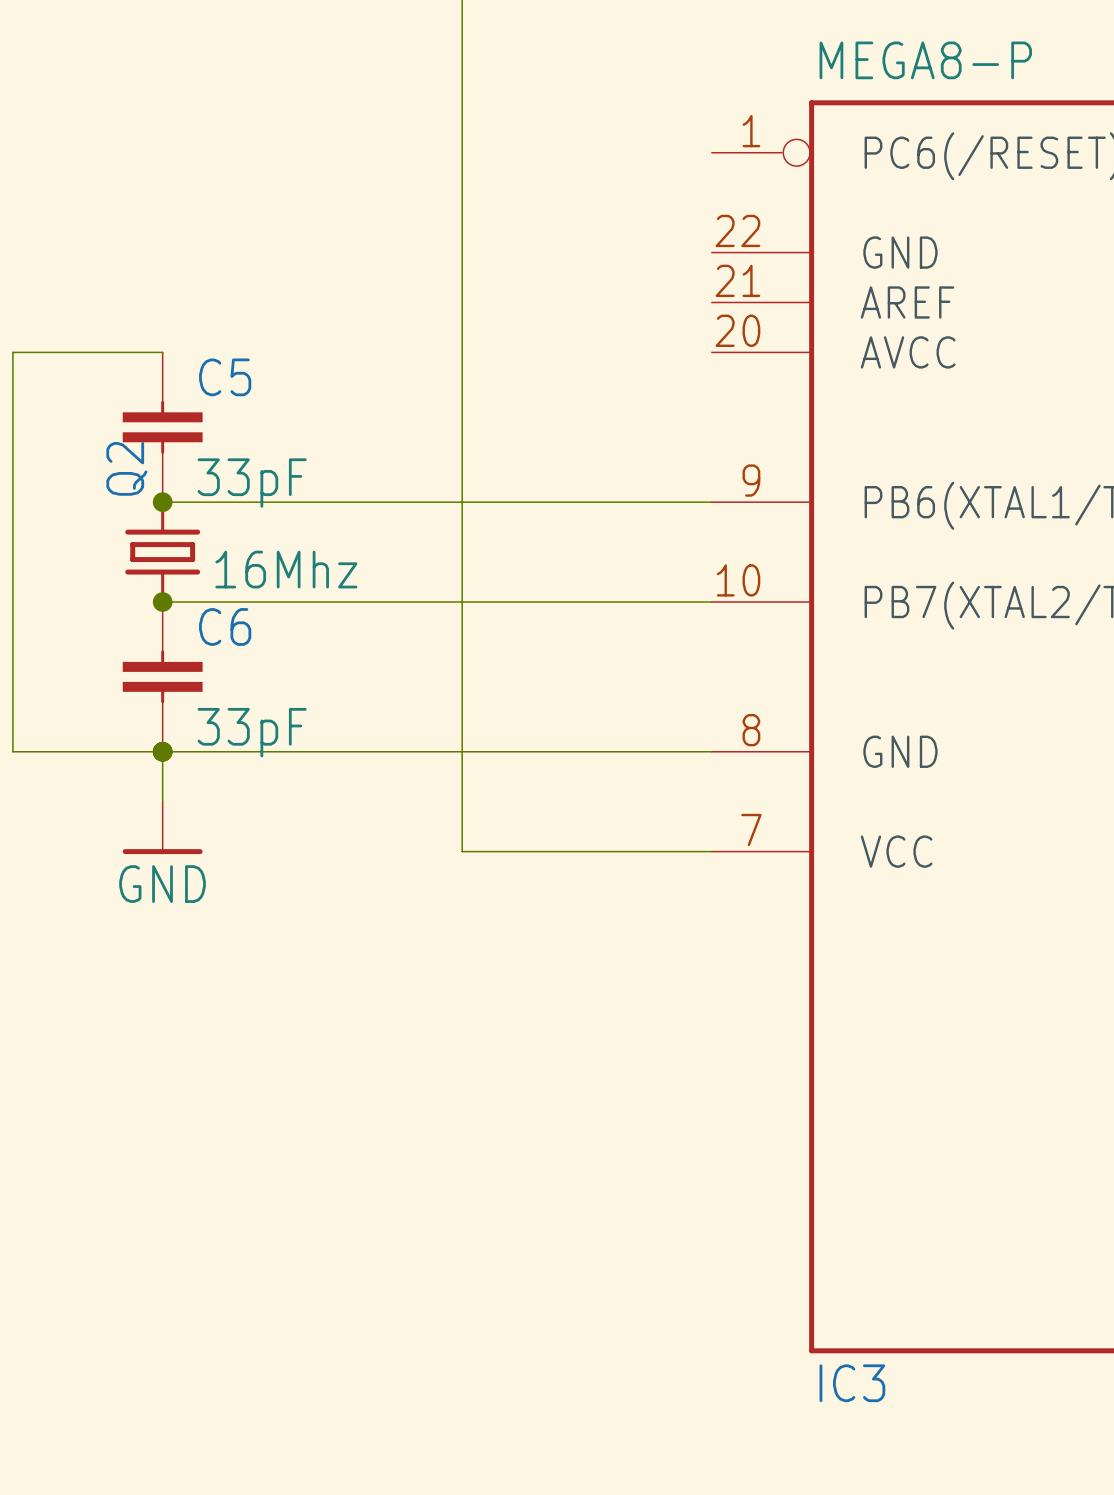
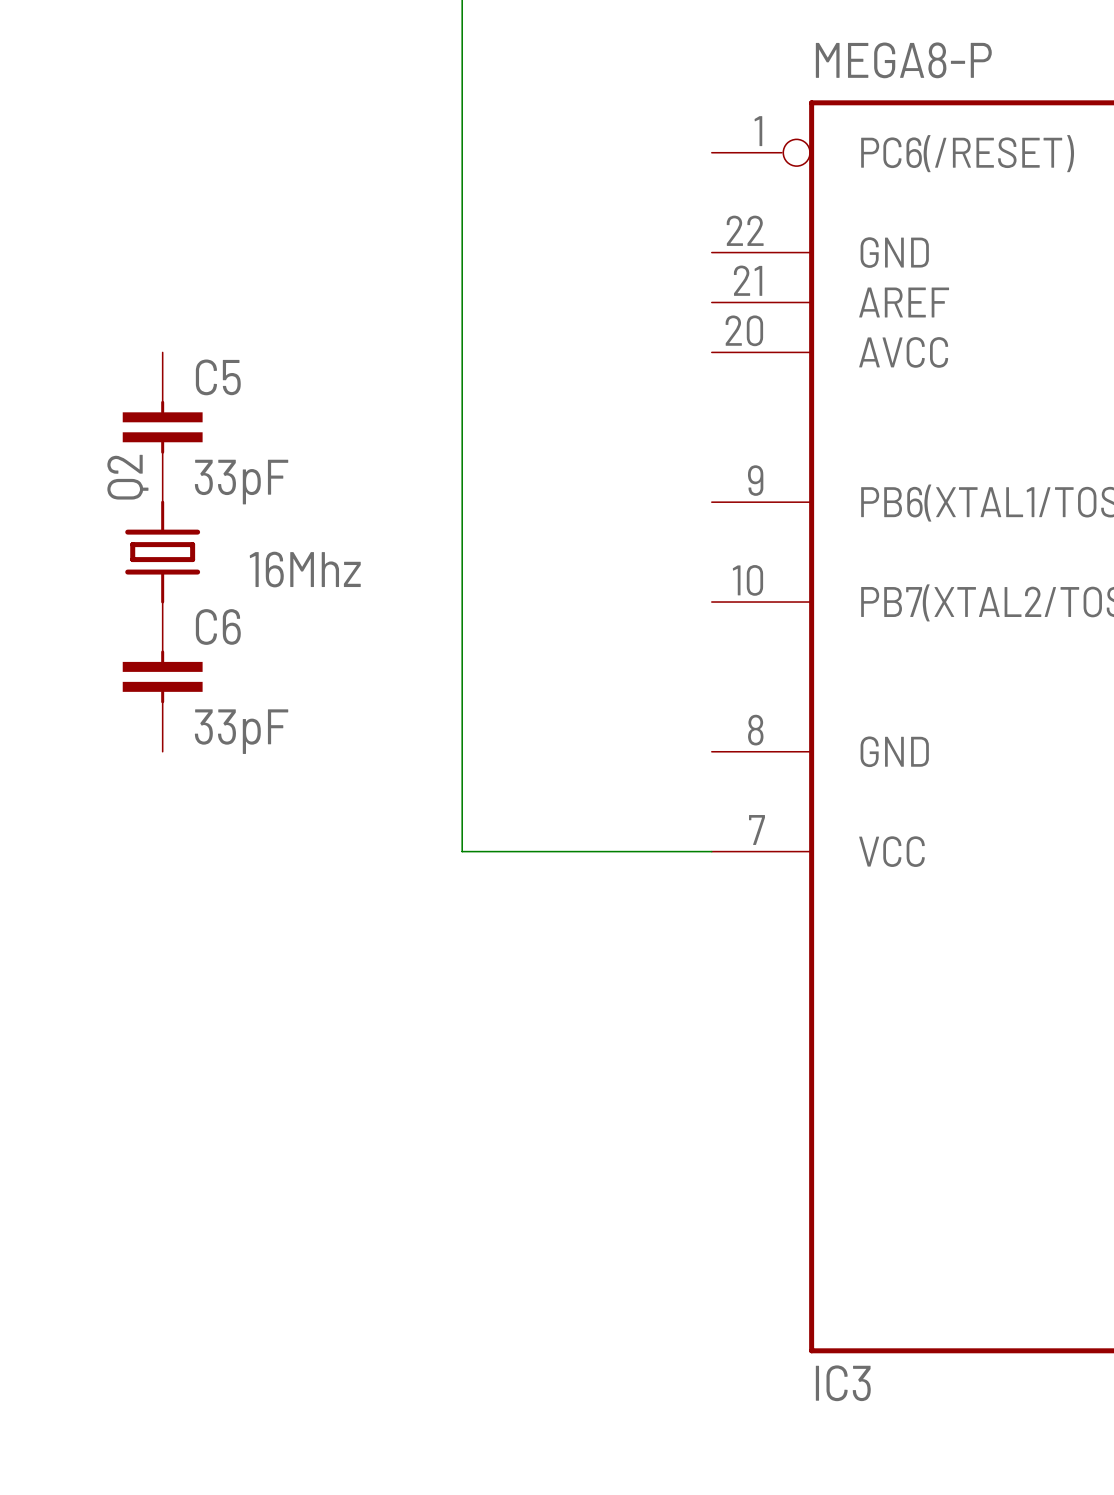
wire: (162, 352) (12, 352) (12, 751) (711, 751) -> none
wire: (162, 502) (711, 502) -> none
junction: (162, 502) -> none
wire: (162, 602) (711, 602) -> none
junction: (162, 602) -> none
wire: (162, 751) (162, 801) -> none
junction: (162, 751) -> none
power symbol: GND (162, 827) -> none

